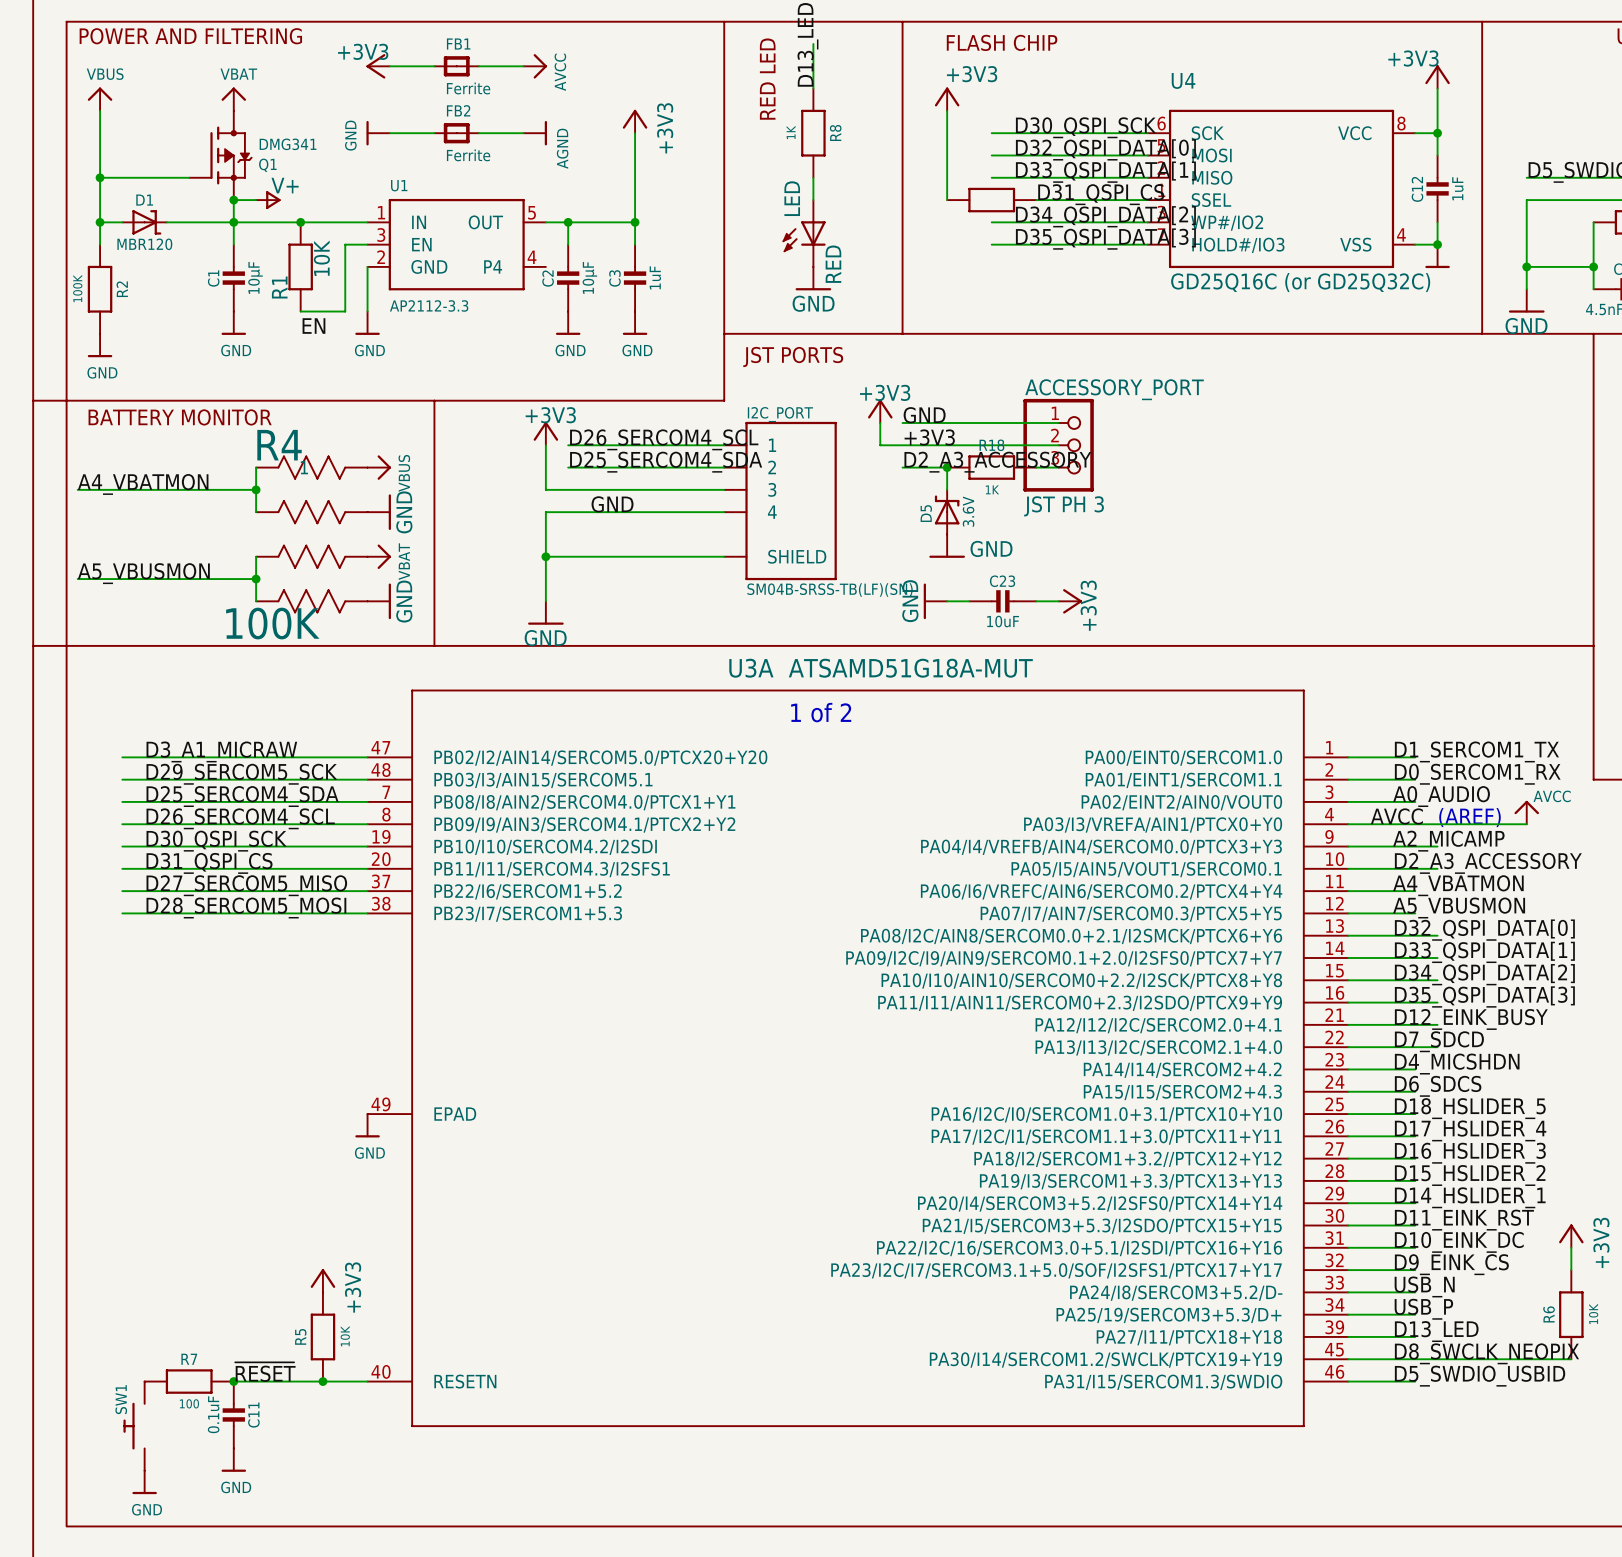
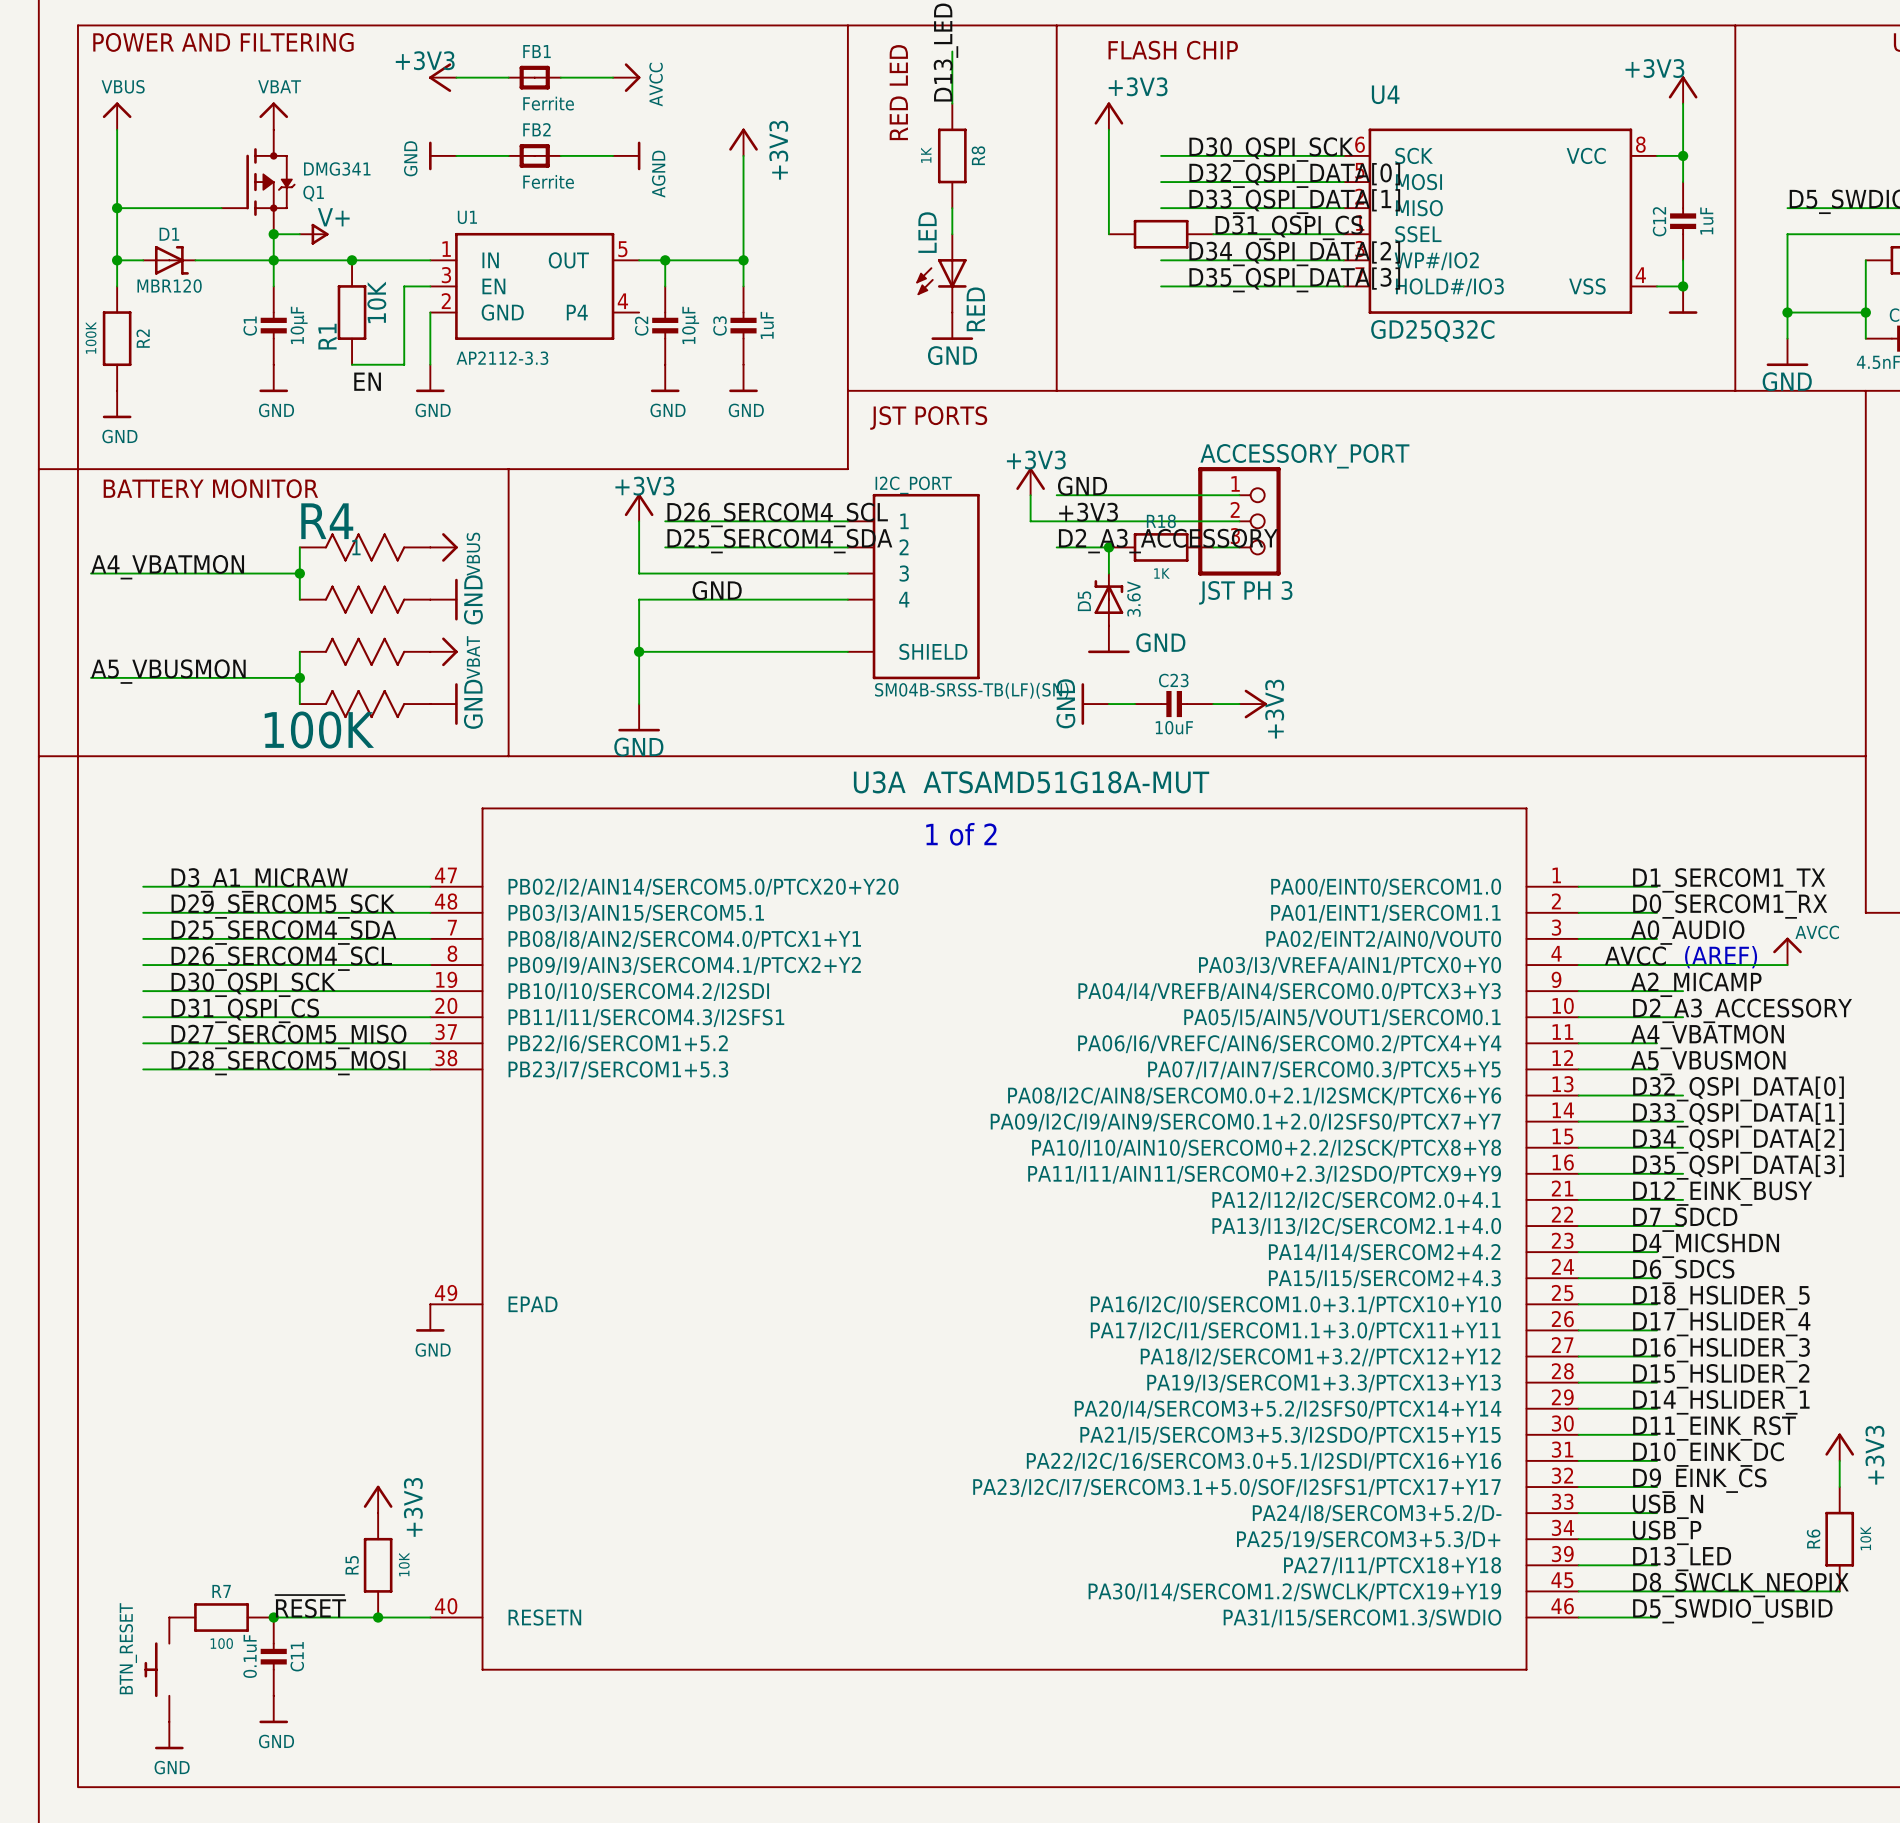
U4 value: GD25Q16C (or GD25Q32C) (1300, 282) -> GD25Q32C (1432, 330)
SW1 name: SW1 (121, 1399) -> BTN_RESET (128, 1648)

